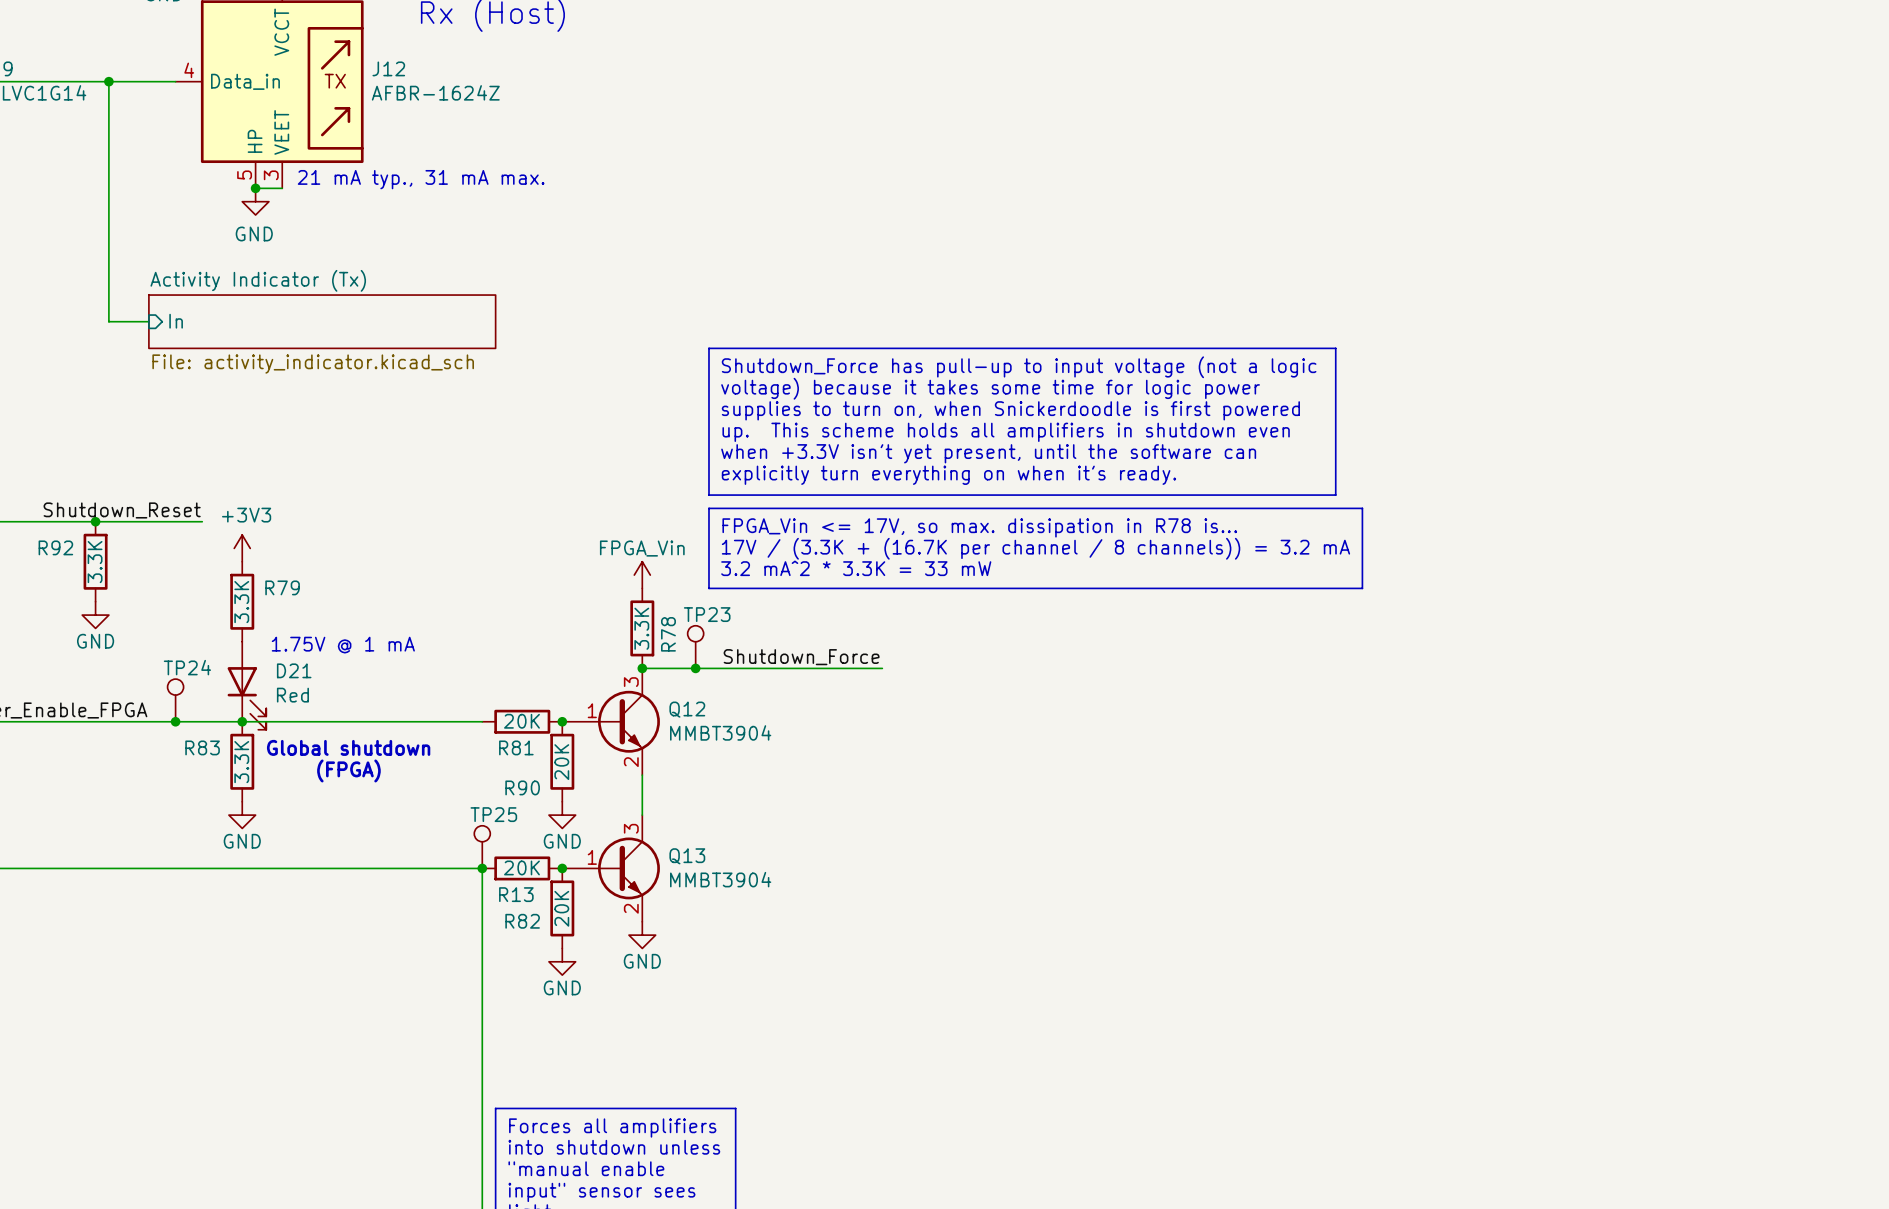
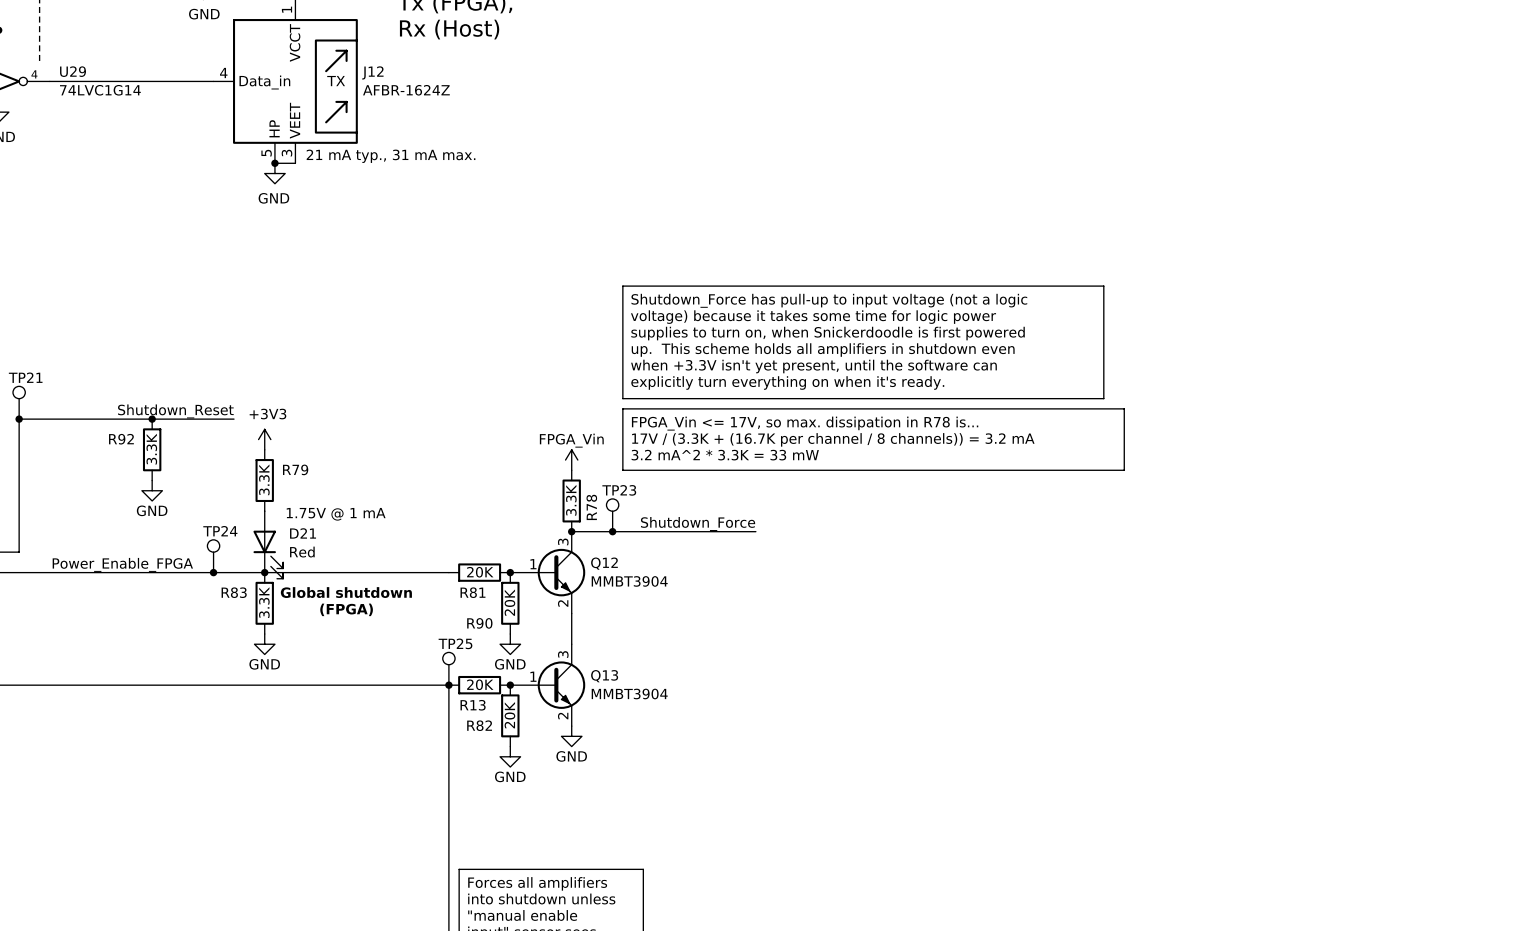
wire: (108, 81) (108, 321) (148, 321) -> none
junction: (108, 81) -> none
sheet pin: In (176, 321) -> none
sheet Activity Indicator (Tx): File: activity_indicator.kicad_sch (322, 321) -> none

